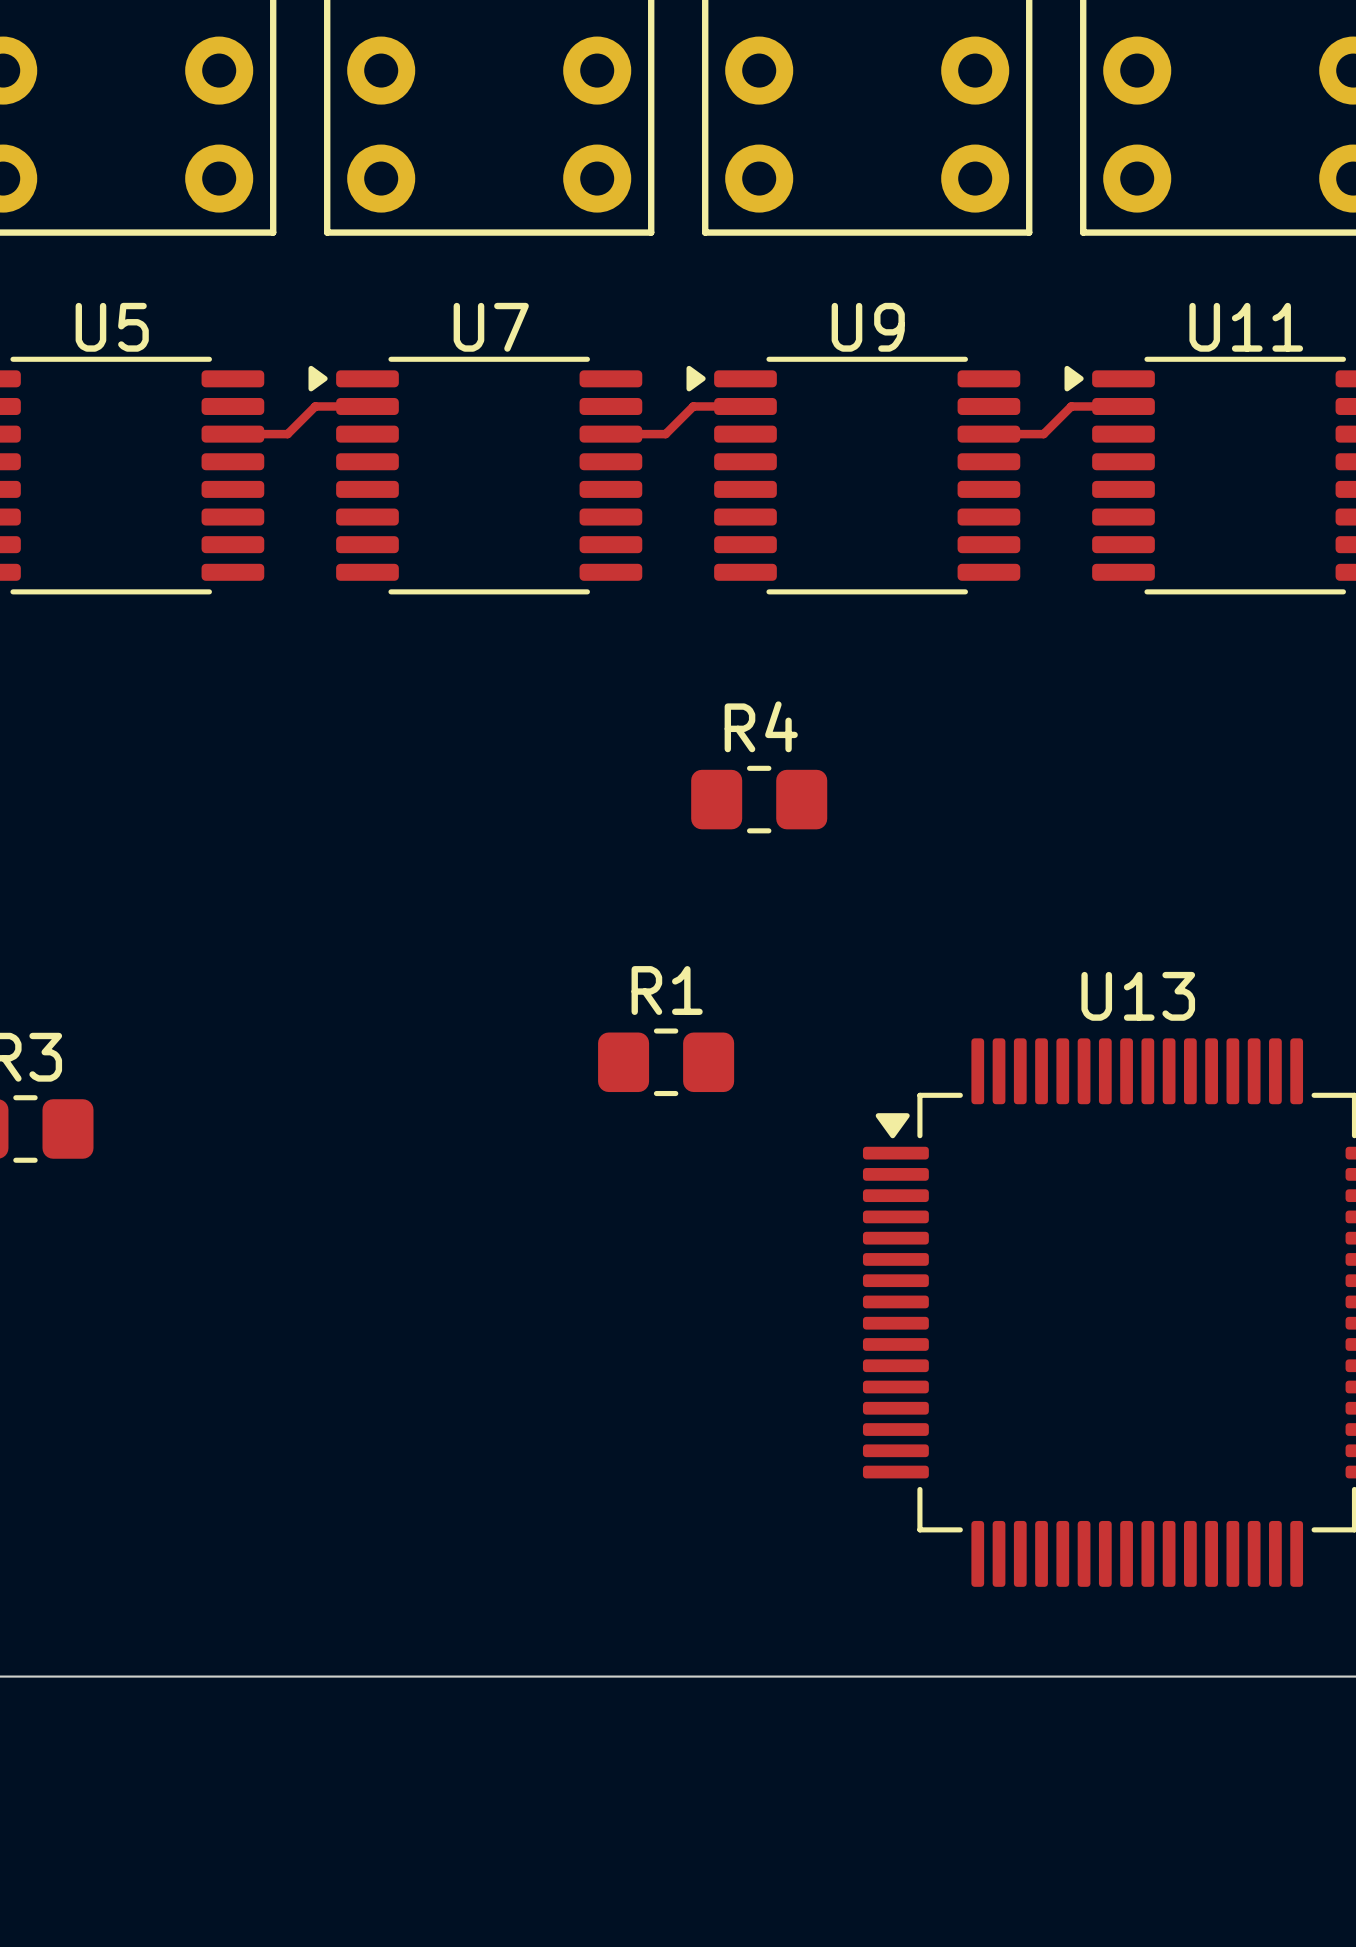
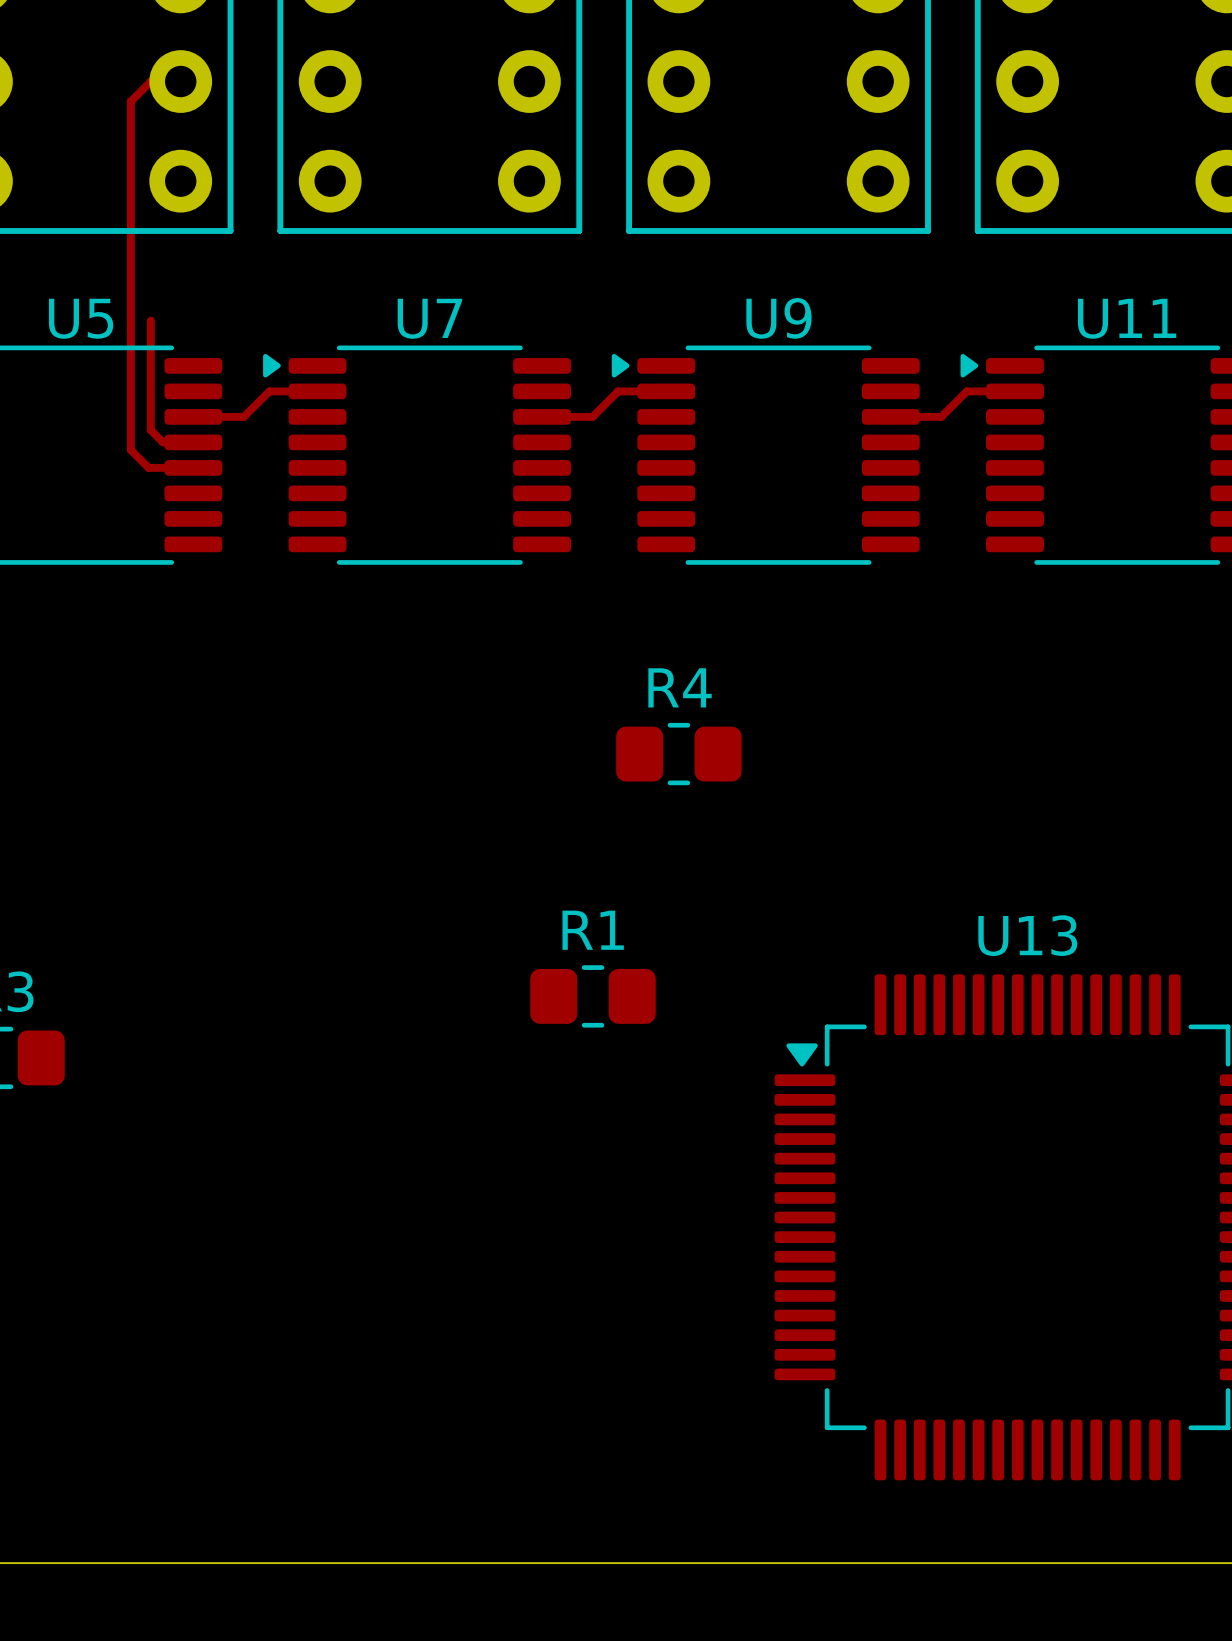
track: none -> (180, 81) (150, 81) (130, 101) (130, 450) (148, 467) (193, 467)
track: none -> (150, 320) (150, 430) (162, 442) (193, 442)

